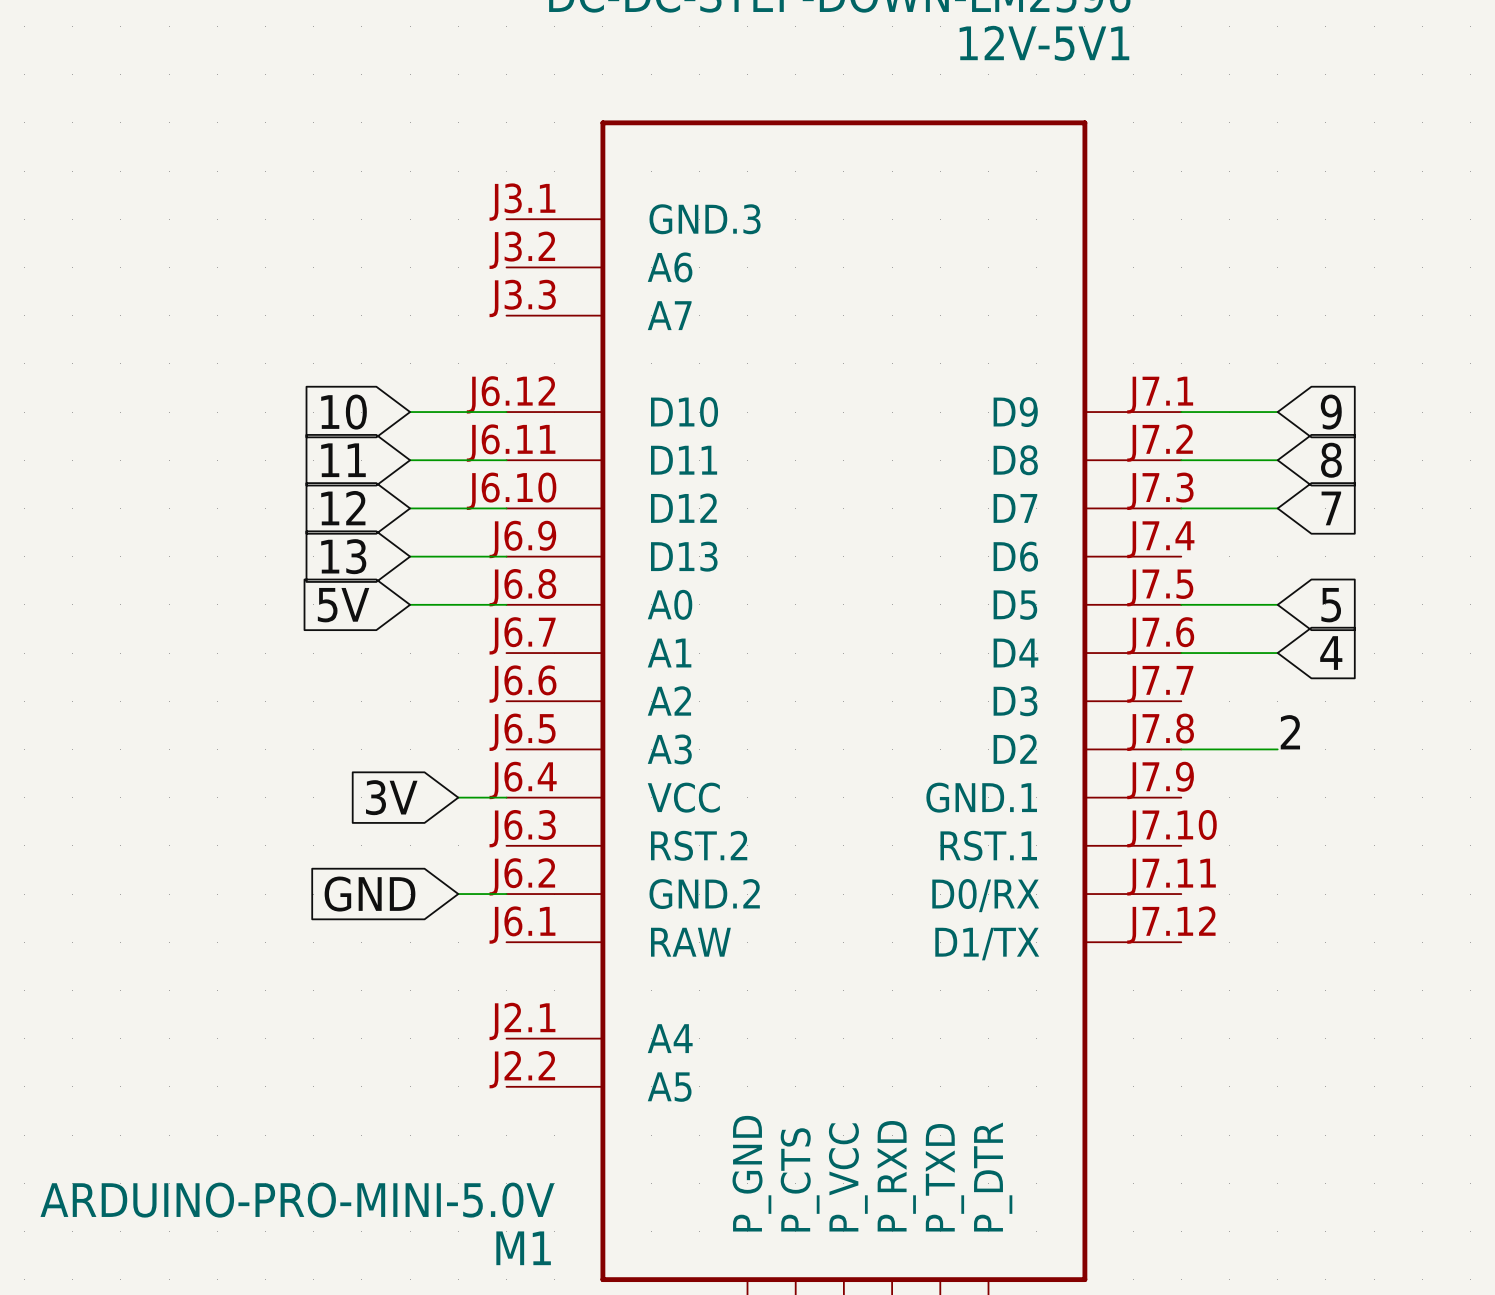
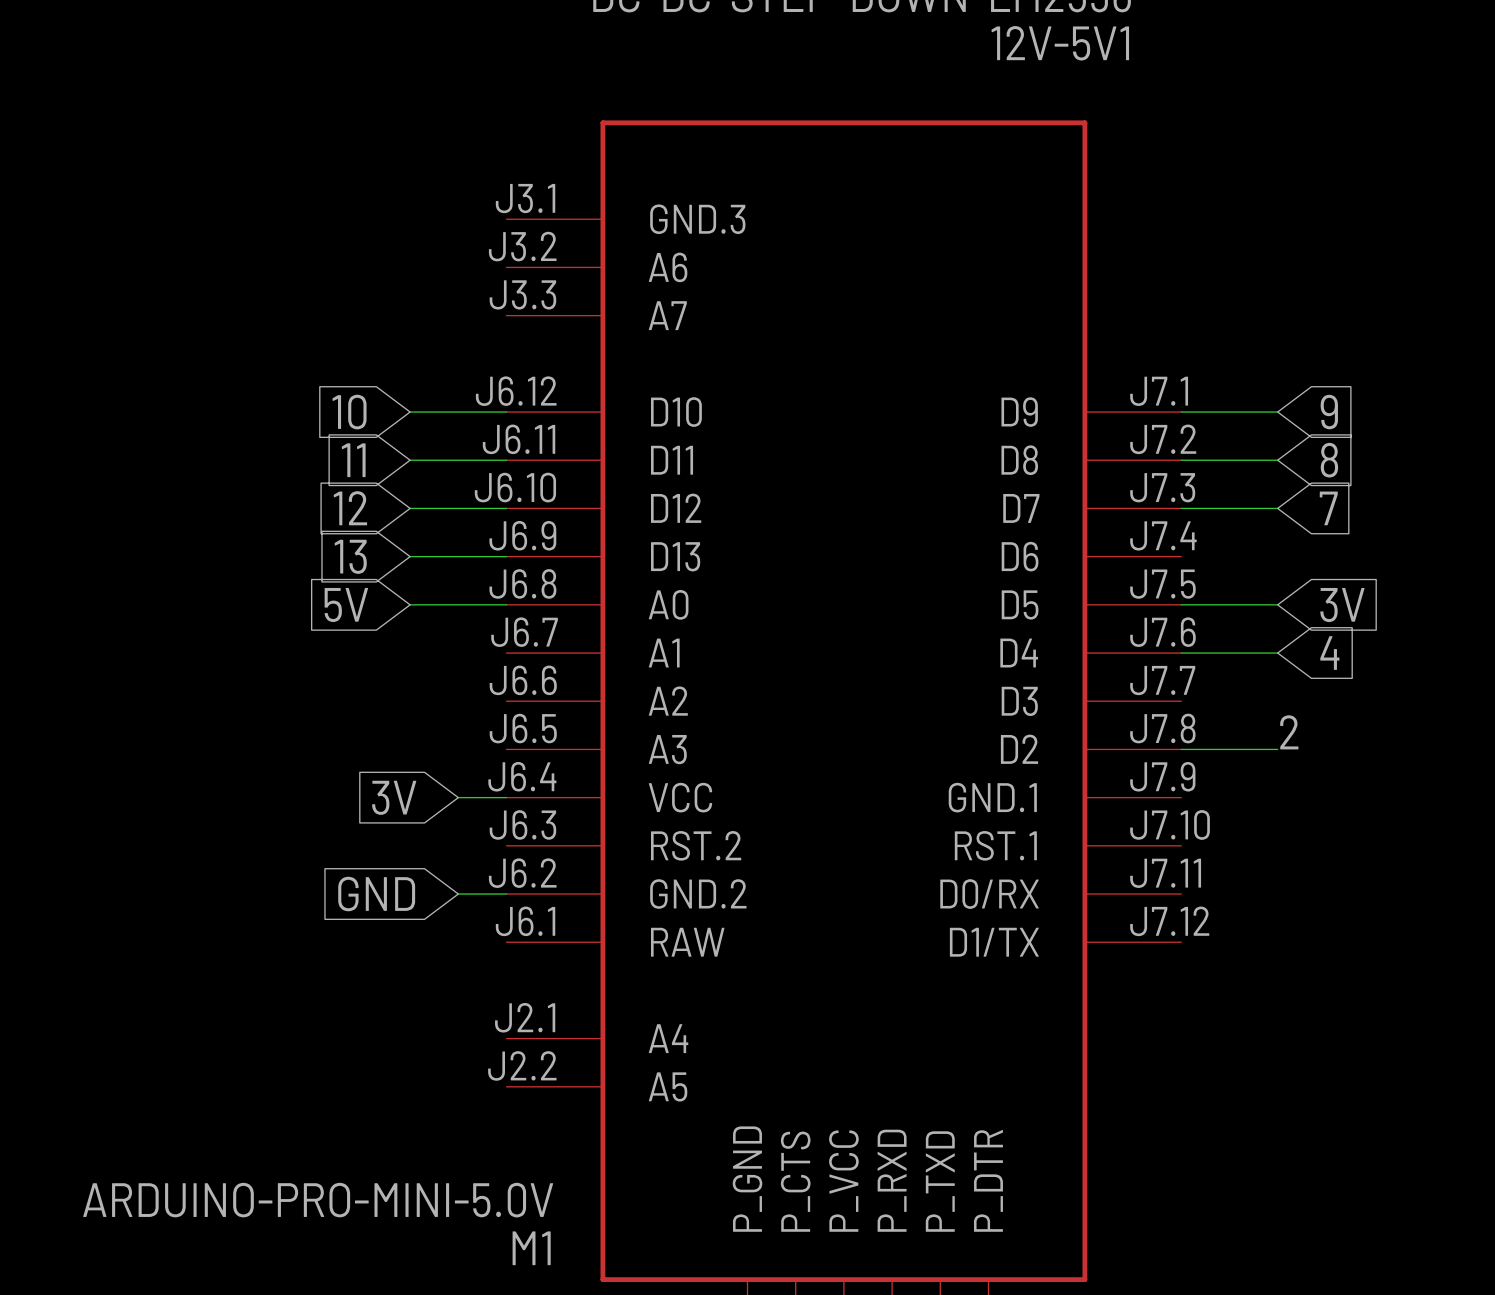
global label: 5 (1331, 605) -> 3V (1342, 605)

